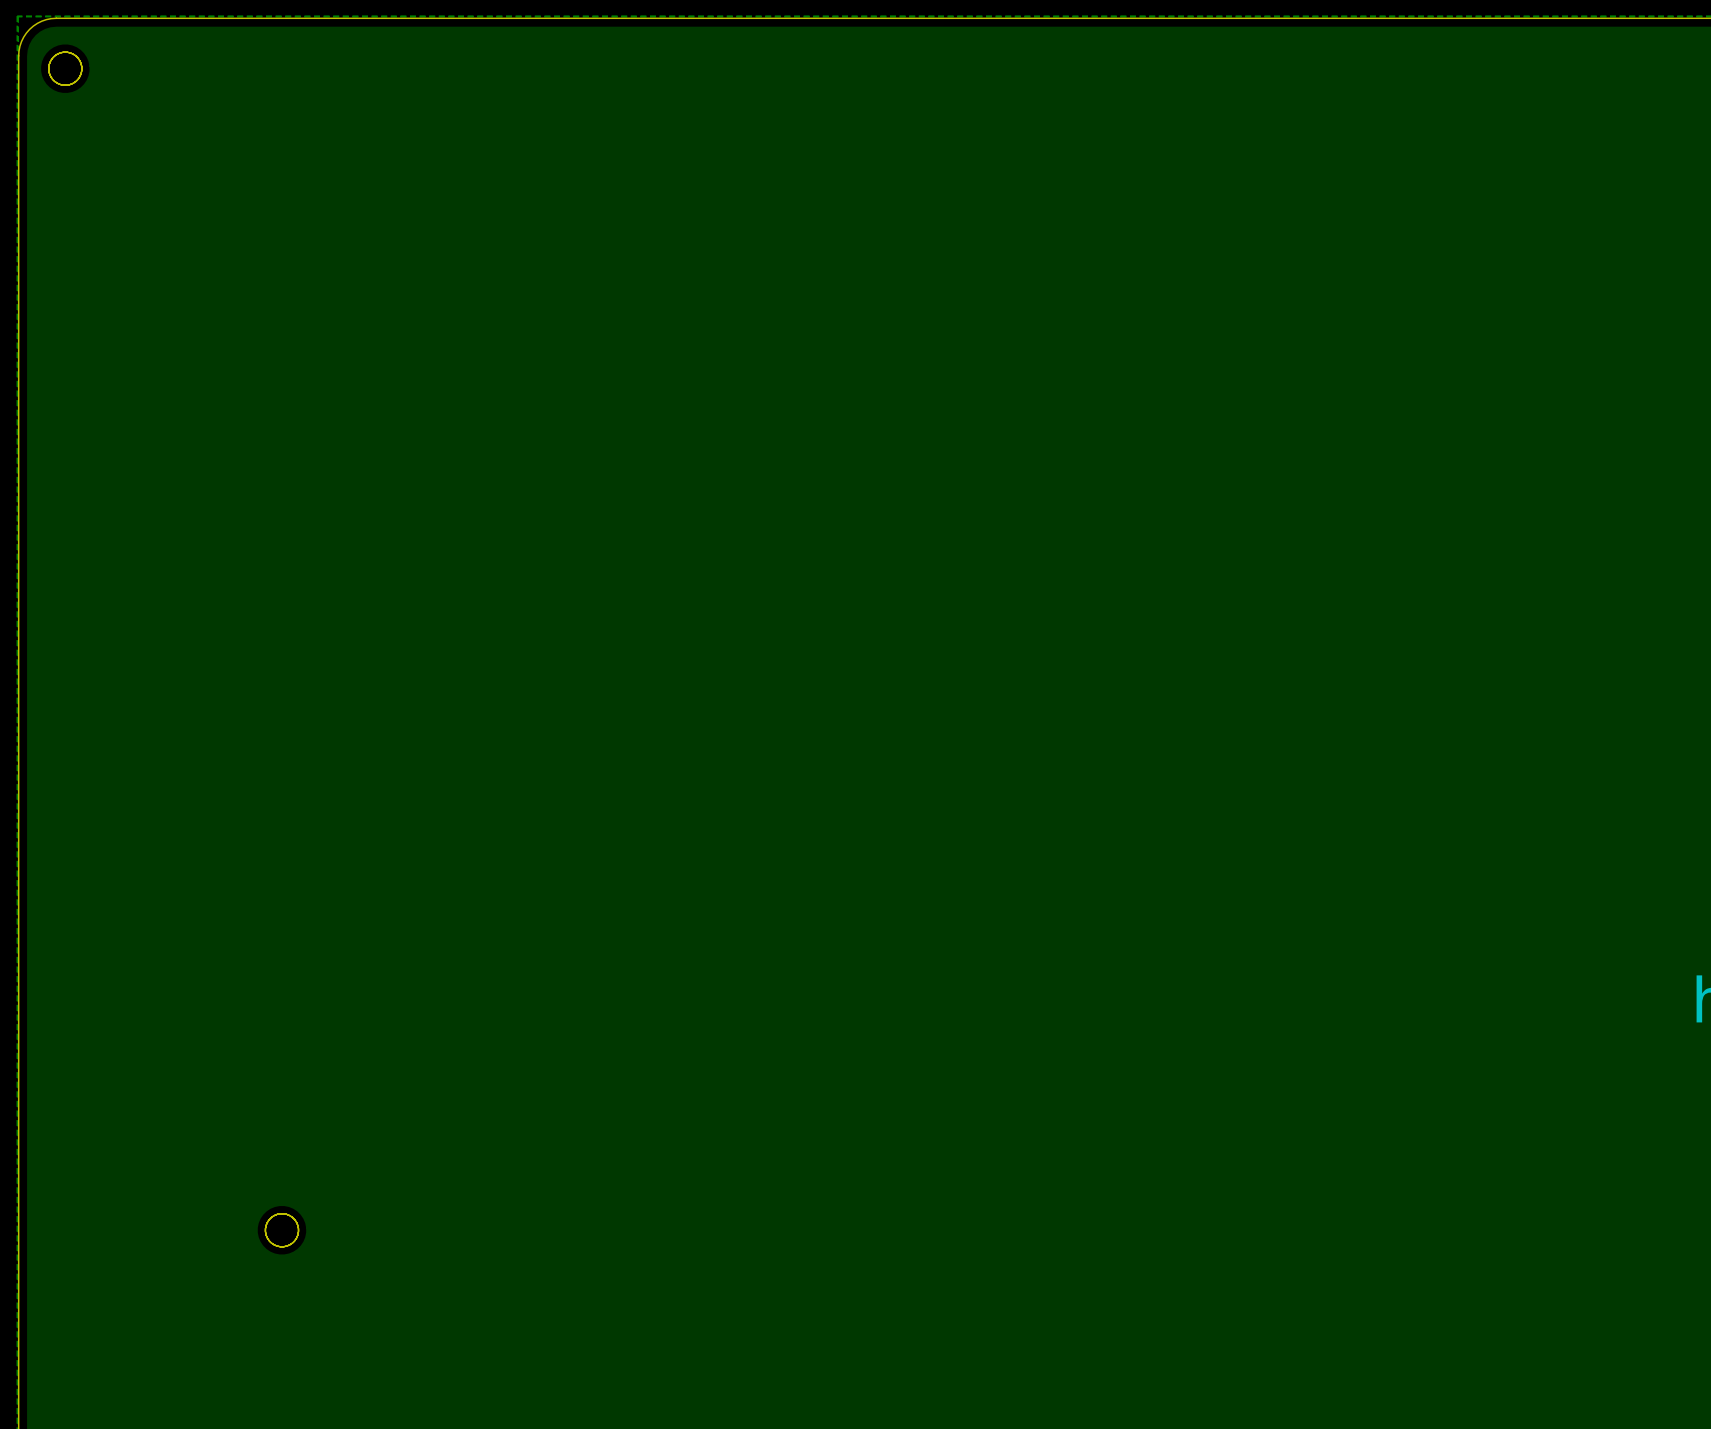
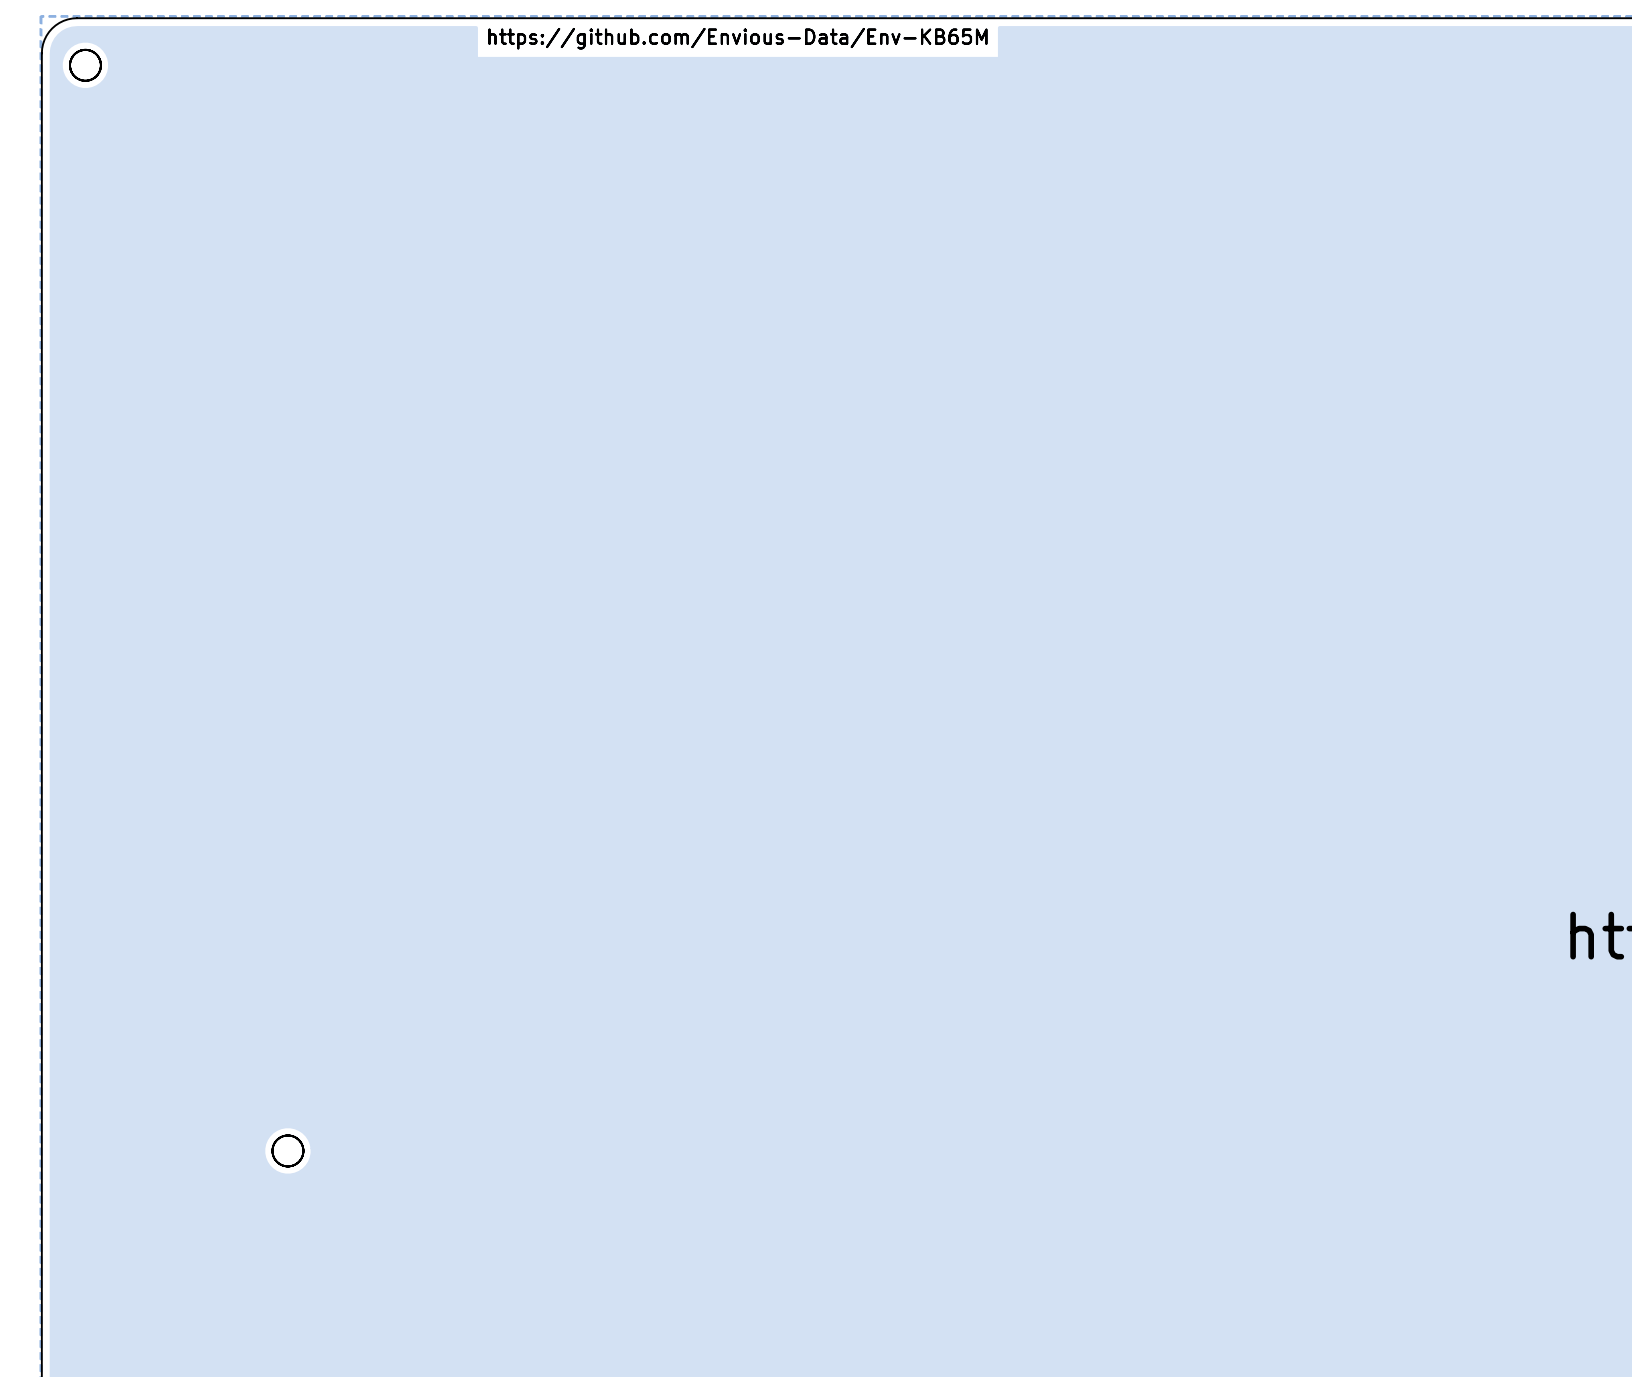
text: none -> https://github.com/Envious-Data/Env-KB65M (737, 38)

